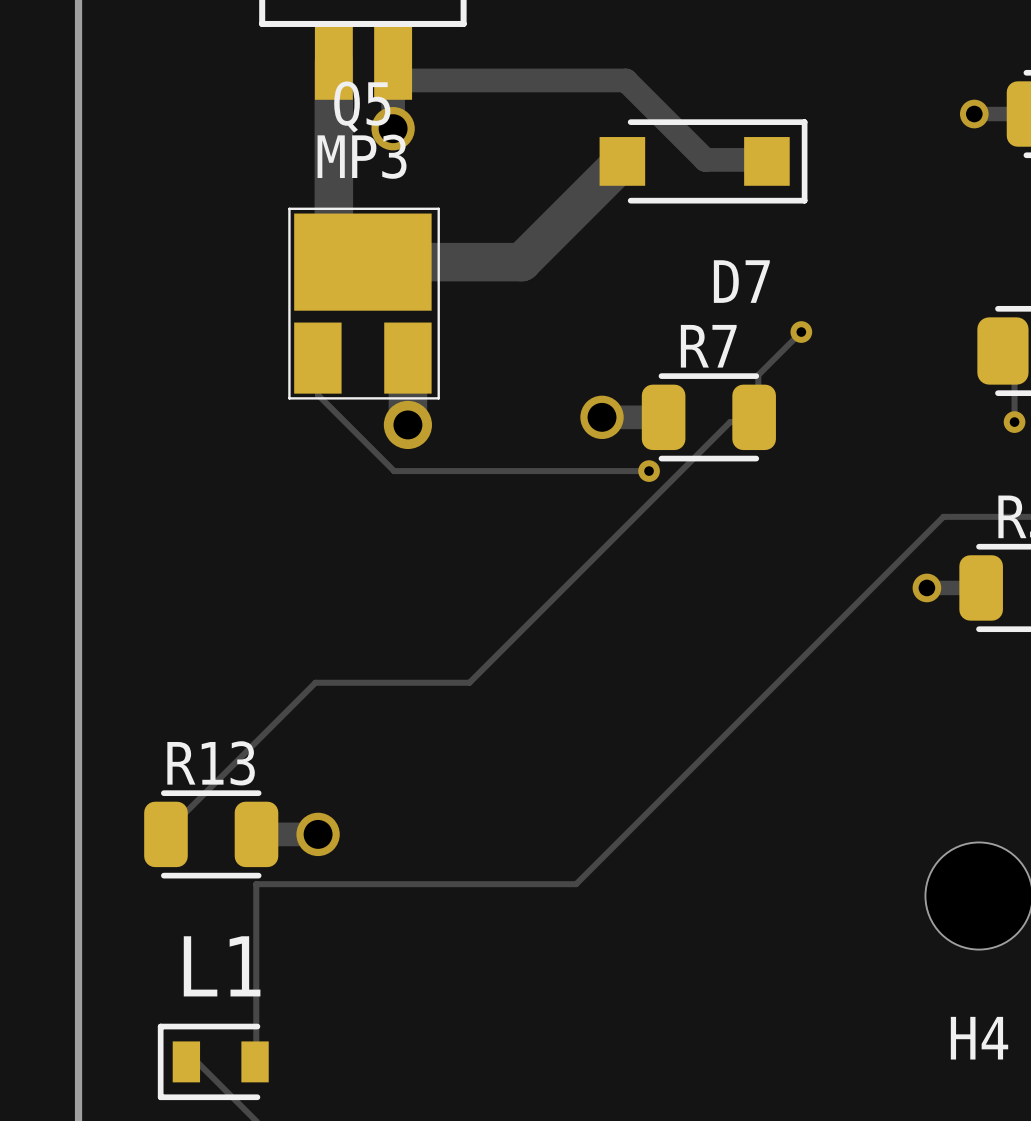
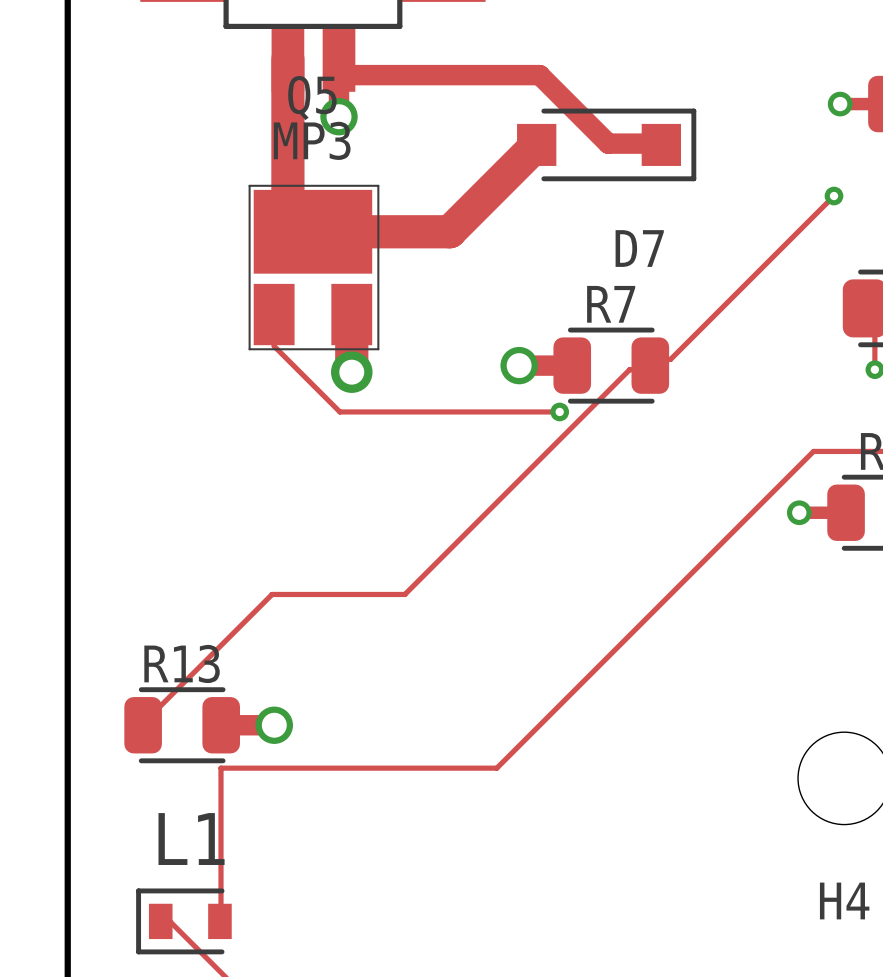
track: (801, 332) (758, 375) (758, 411) (754, 417) -> (834, 196) (670, 359) (660, 359) (650, 365)
via position: (801, 332) -> (834, 196)

